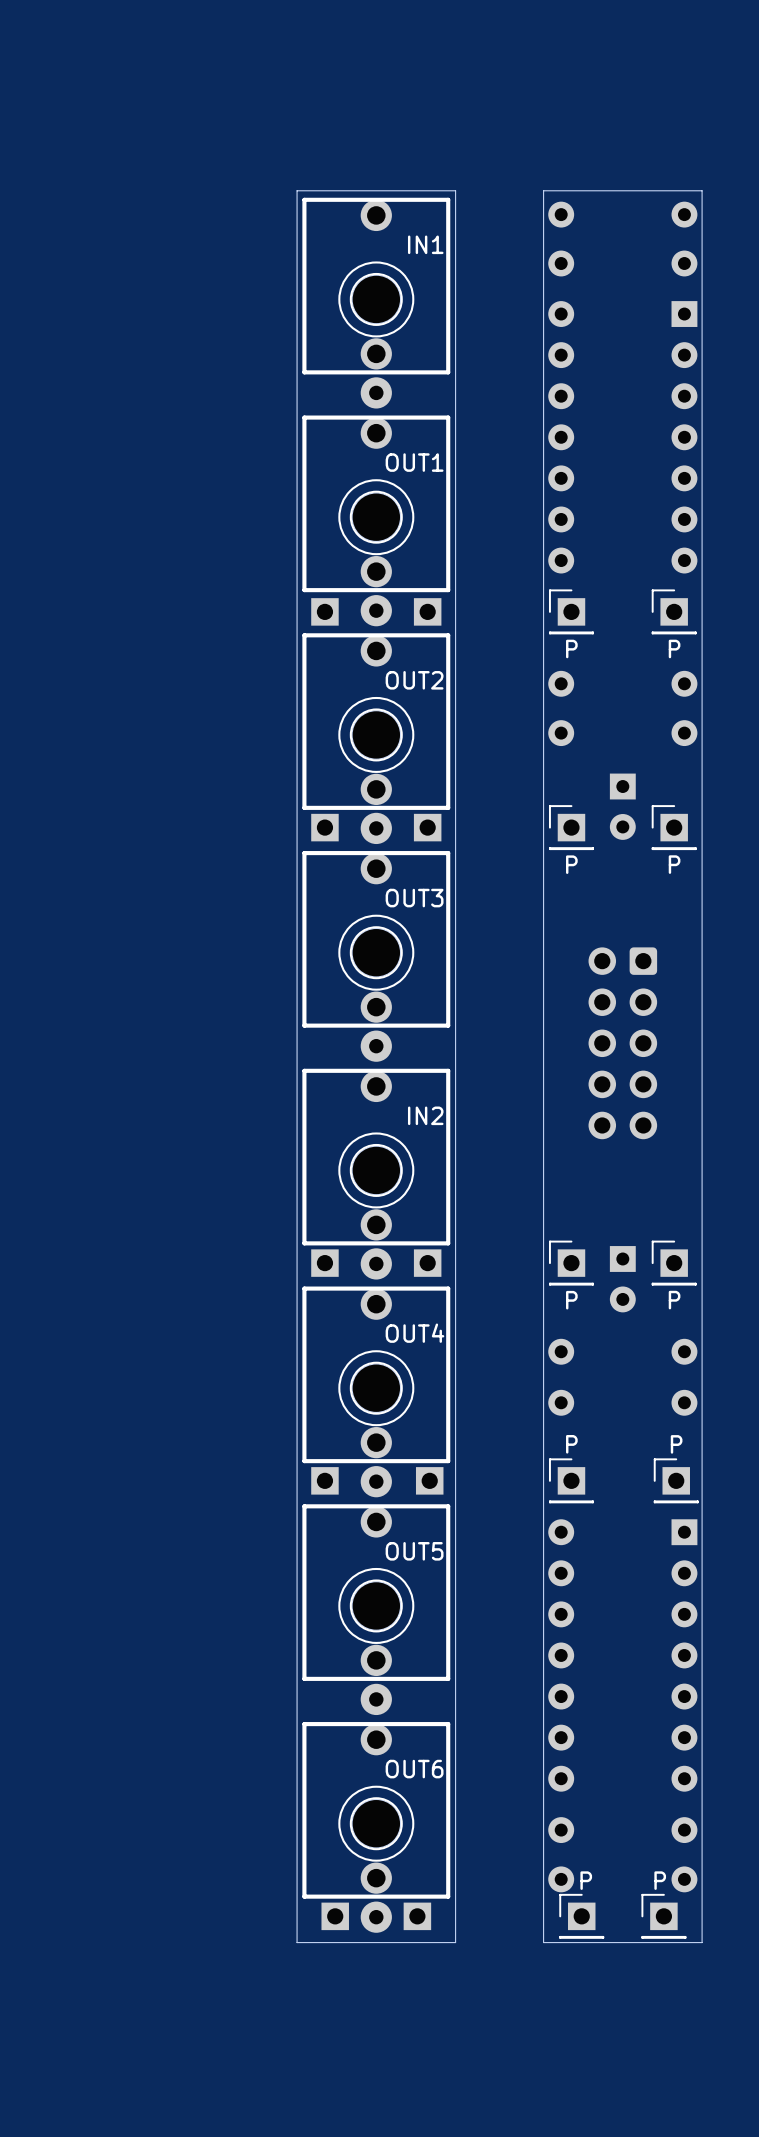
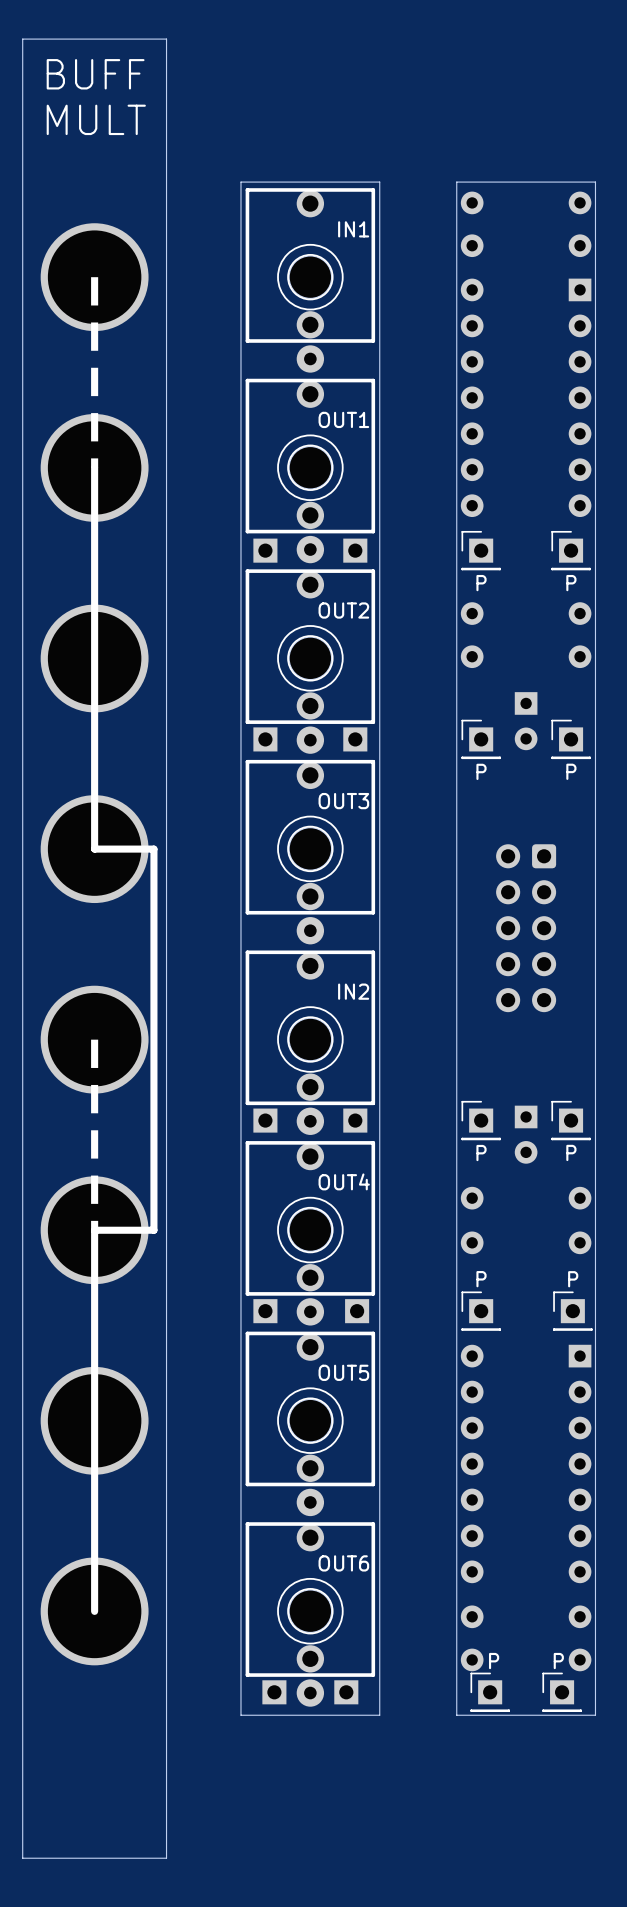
board edge: none -> (22, 39) (166, 39) (166, 1858) (22, 1858) (22, 39)
text: none -> BUFF (95, 74)
text: none -> MULT (96, 119)
line: none -> (94, 277) (94, 849) (153, 849) (153, 1230) (94, 1230)
part: none -> (94, 277)
part: none -> (94, 467)
part: none -> (94, 658)
part: none -> (94, 849)
line: none -> (94, 1039) (94, 1230)
part: none -> (94, 1039)
line: none -> (94, 1230) (94, 1611)
part: none -> (94, 1230)
part: none -> (94, 1420)
part: none -> (94, 1611)

